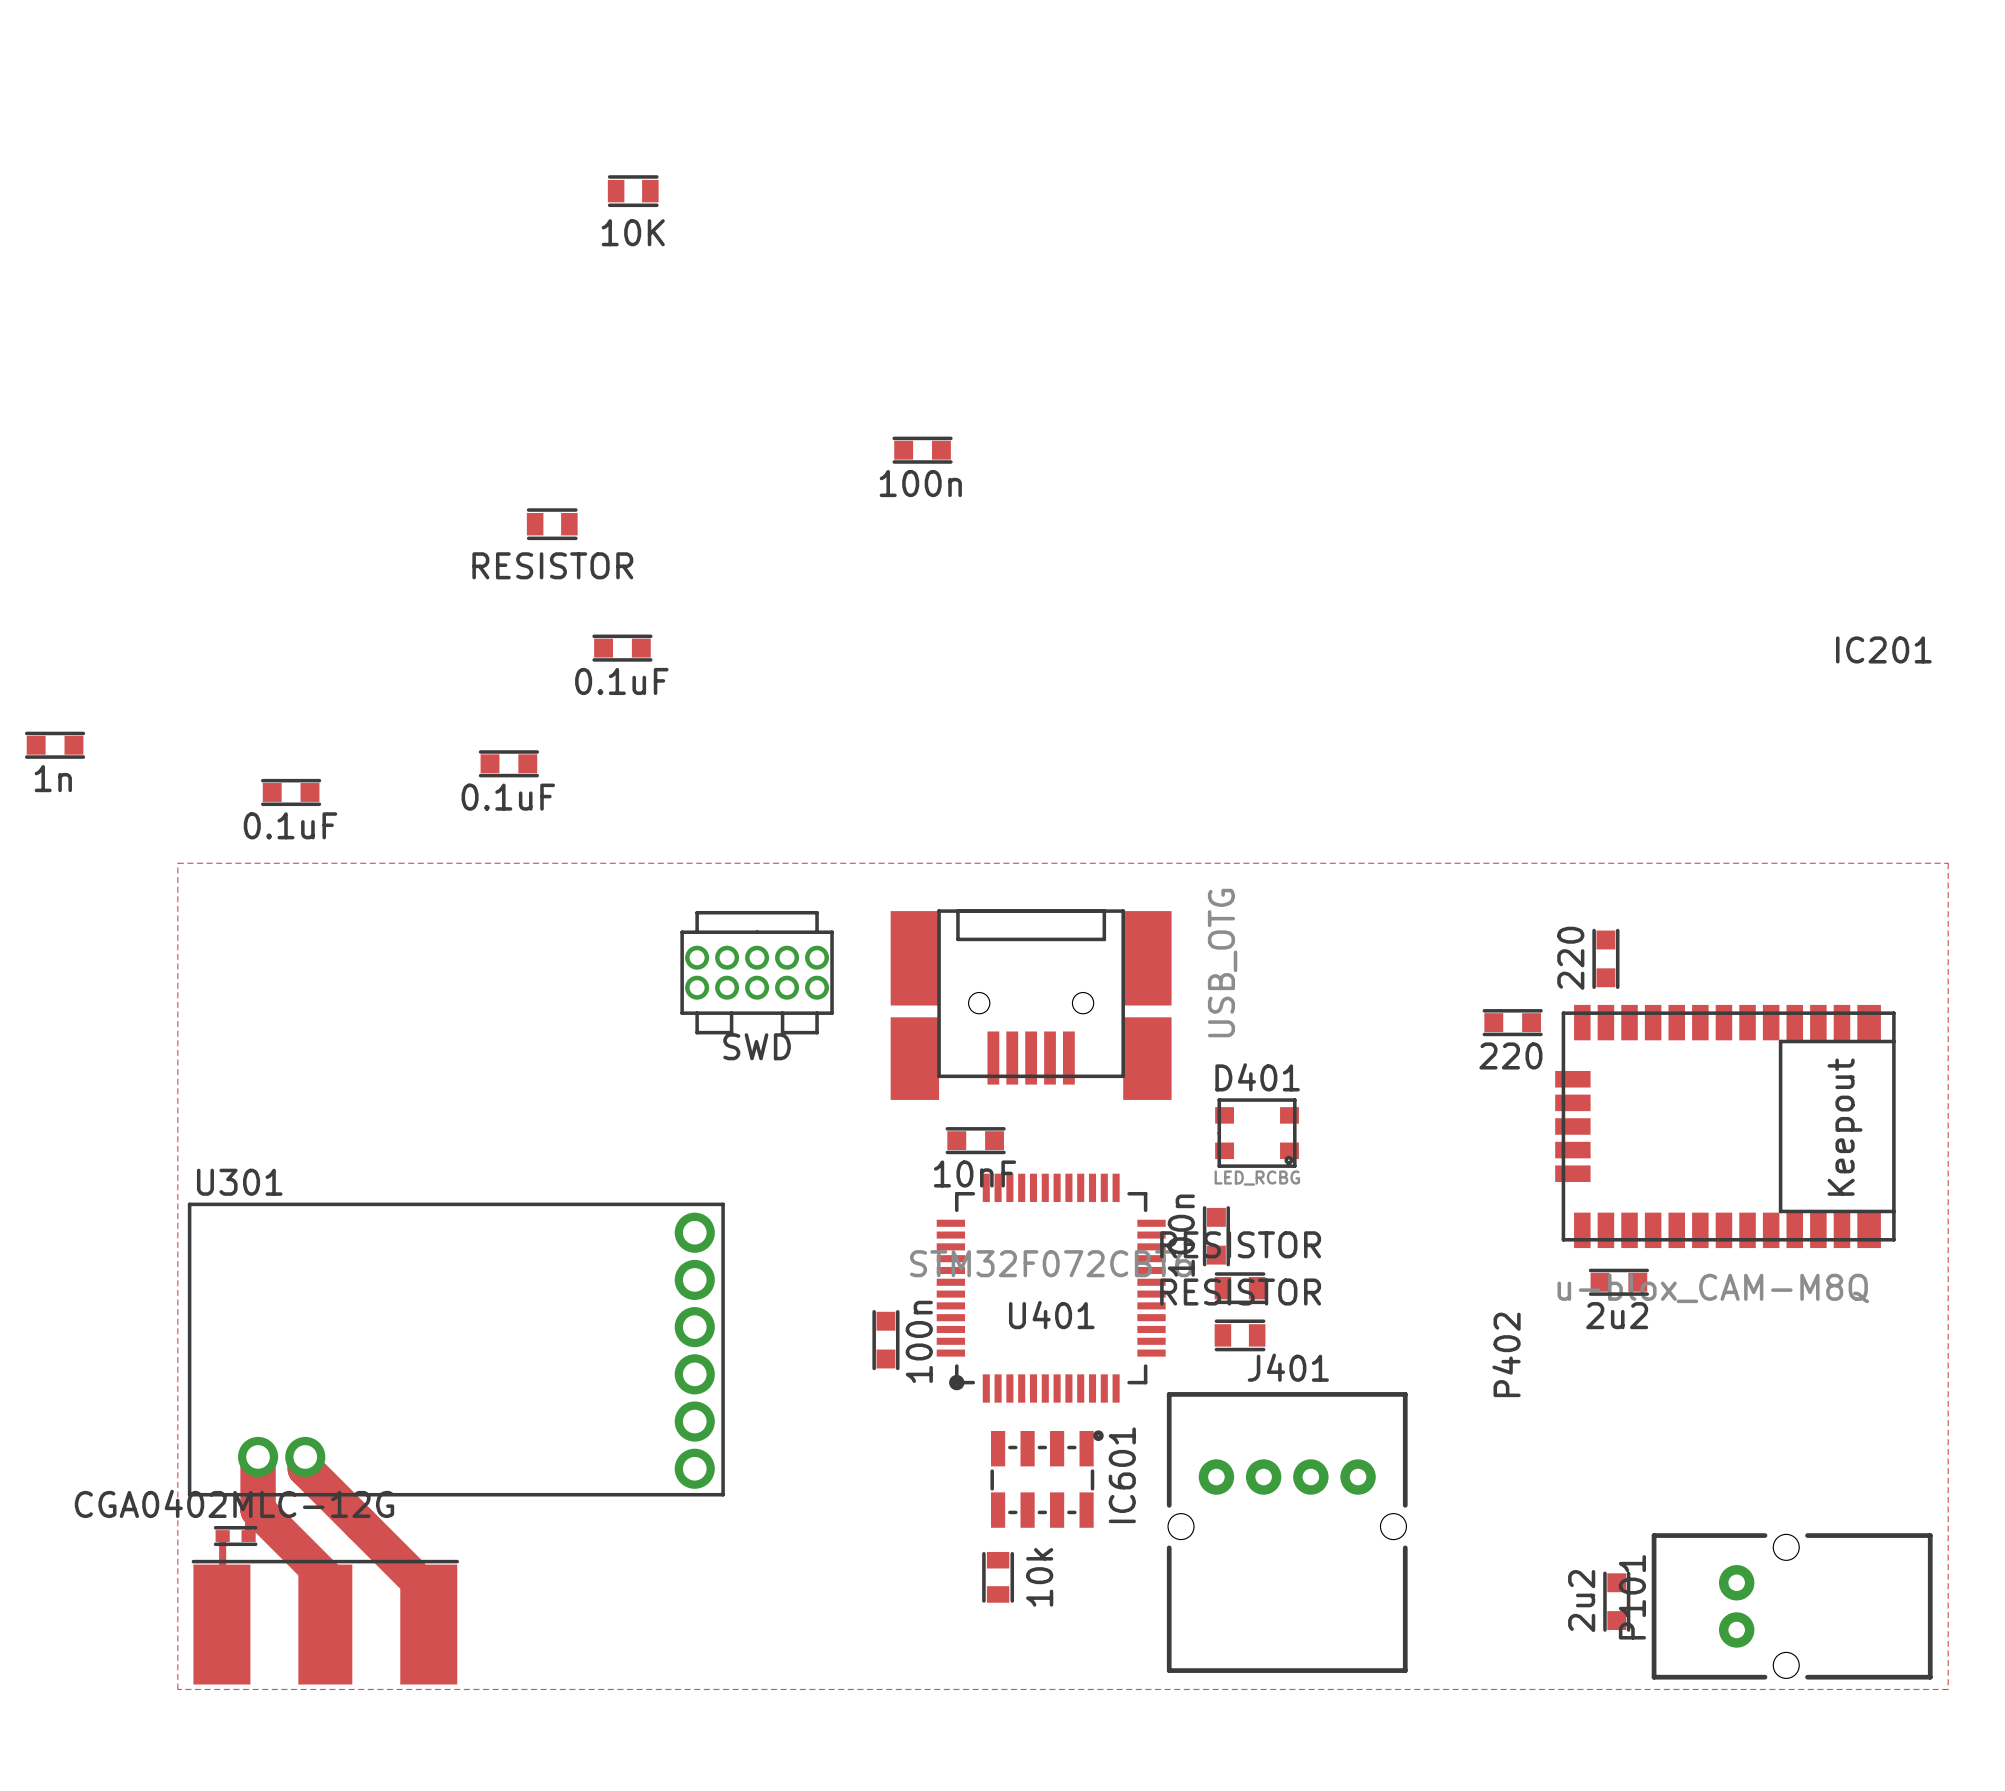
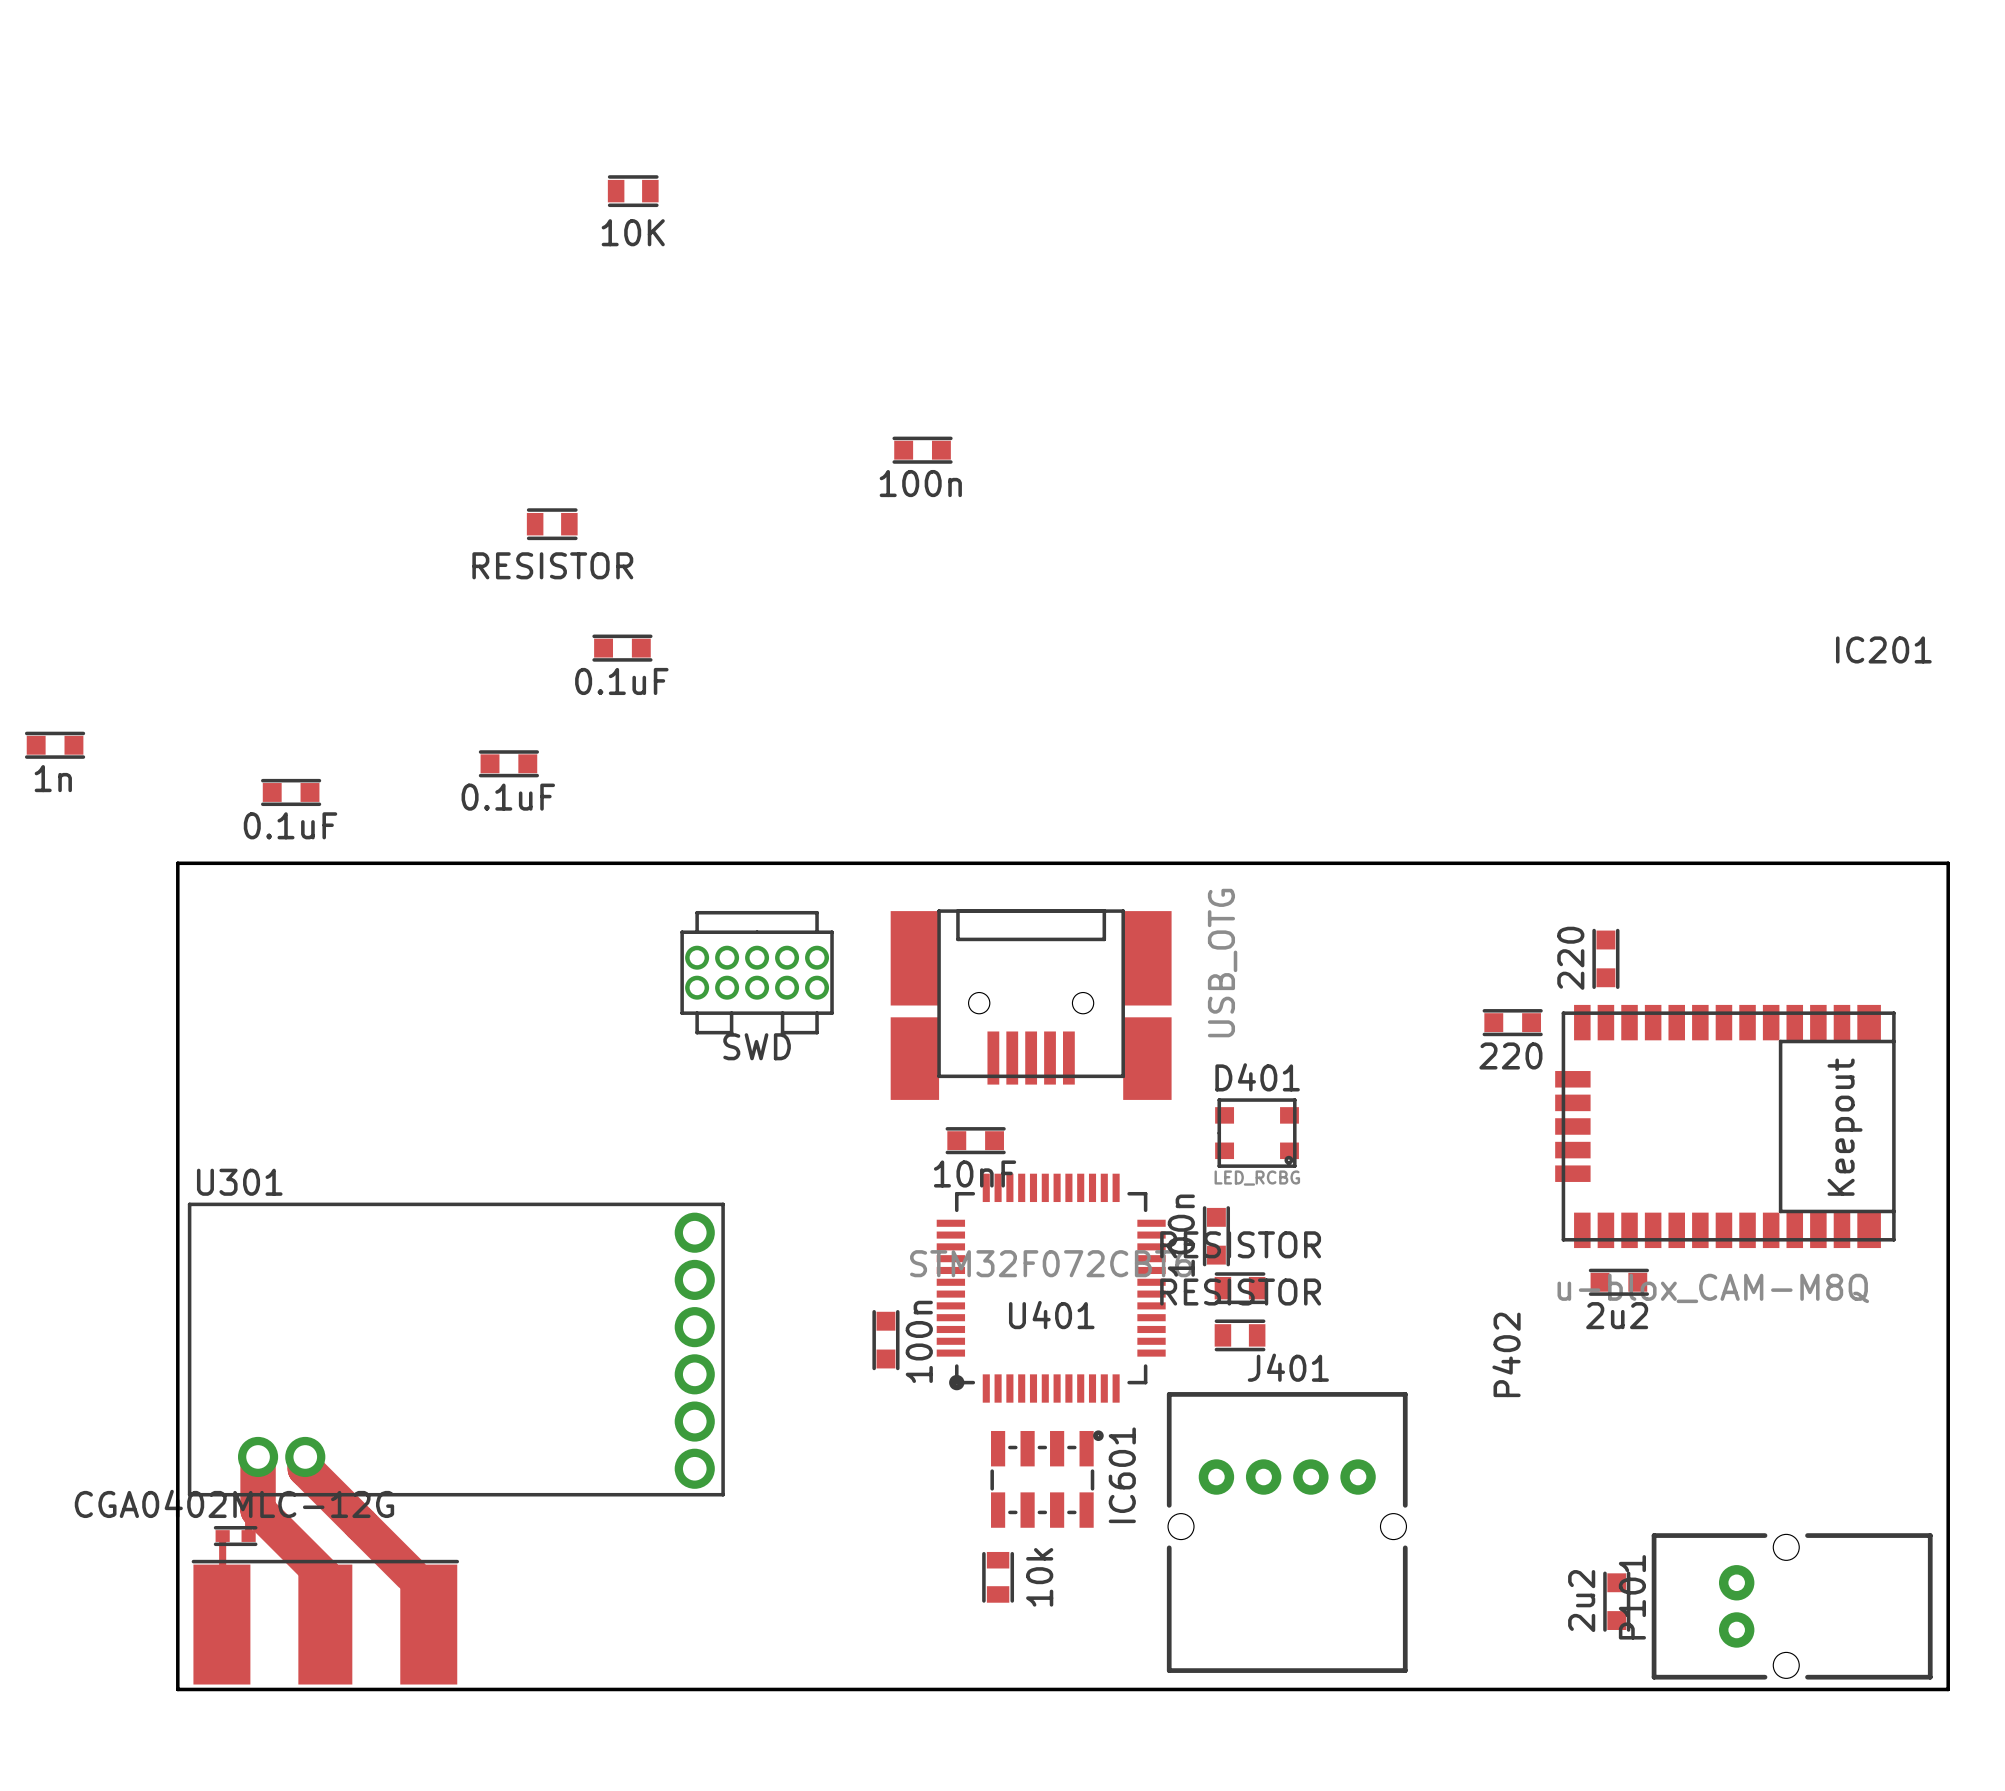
board edge: none -> (177, 863) (177, 1689) (1948, 1689) (1948, 863) (177, 863)

